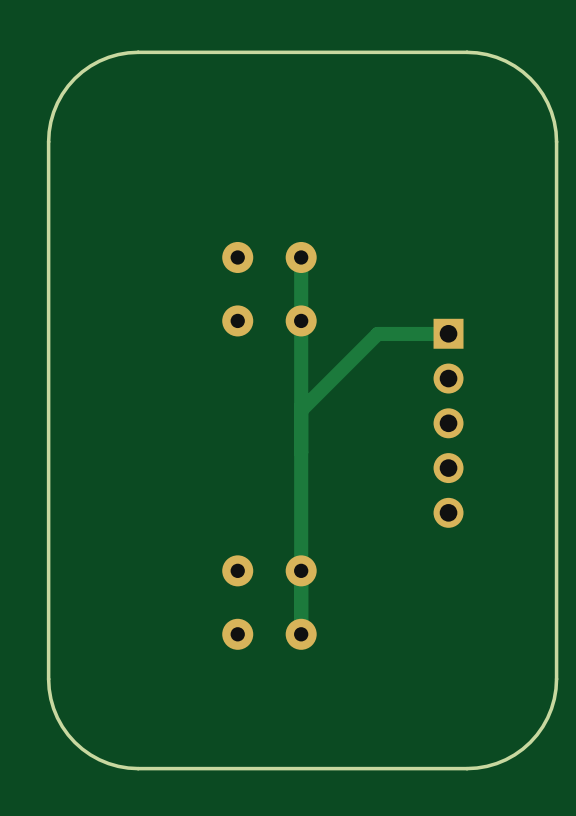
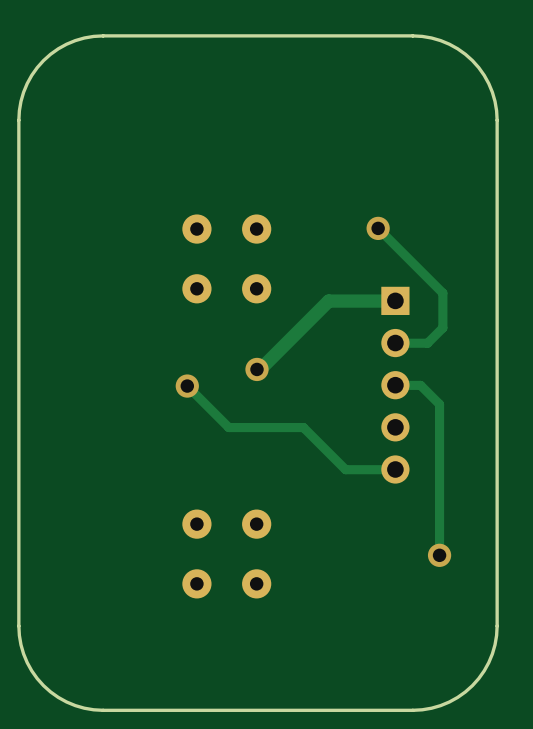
track: none -> (378, 228) (442, 293) (442, 327) (427, 343) (395, 343)
via: none -> (378, 228)
track: (301, 257) (301, 634) -> none
via: none -> (257, 369)
track: none -> (395, 385) (420, 385) (439, 404) (439, 555)
track: none -> (187, 386) (228, 427) (303, 427) (345, 469) (395, 469)
via: none -> (187, 386)
via: none -> (439, 555)

